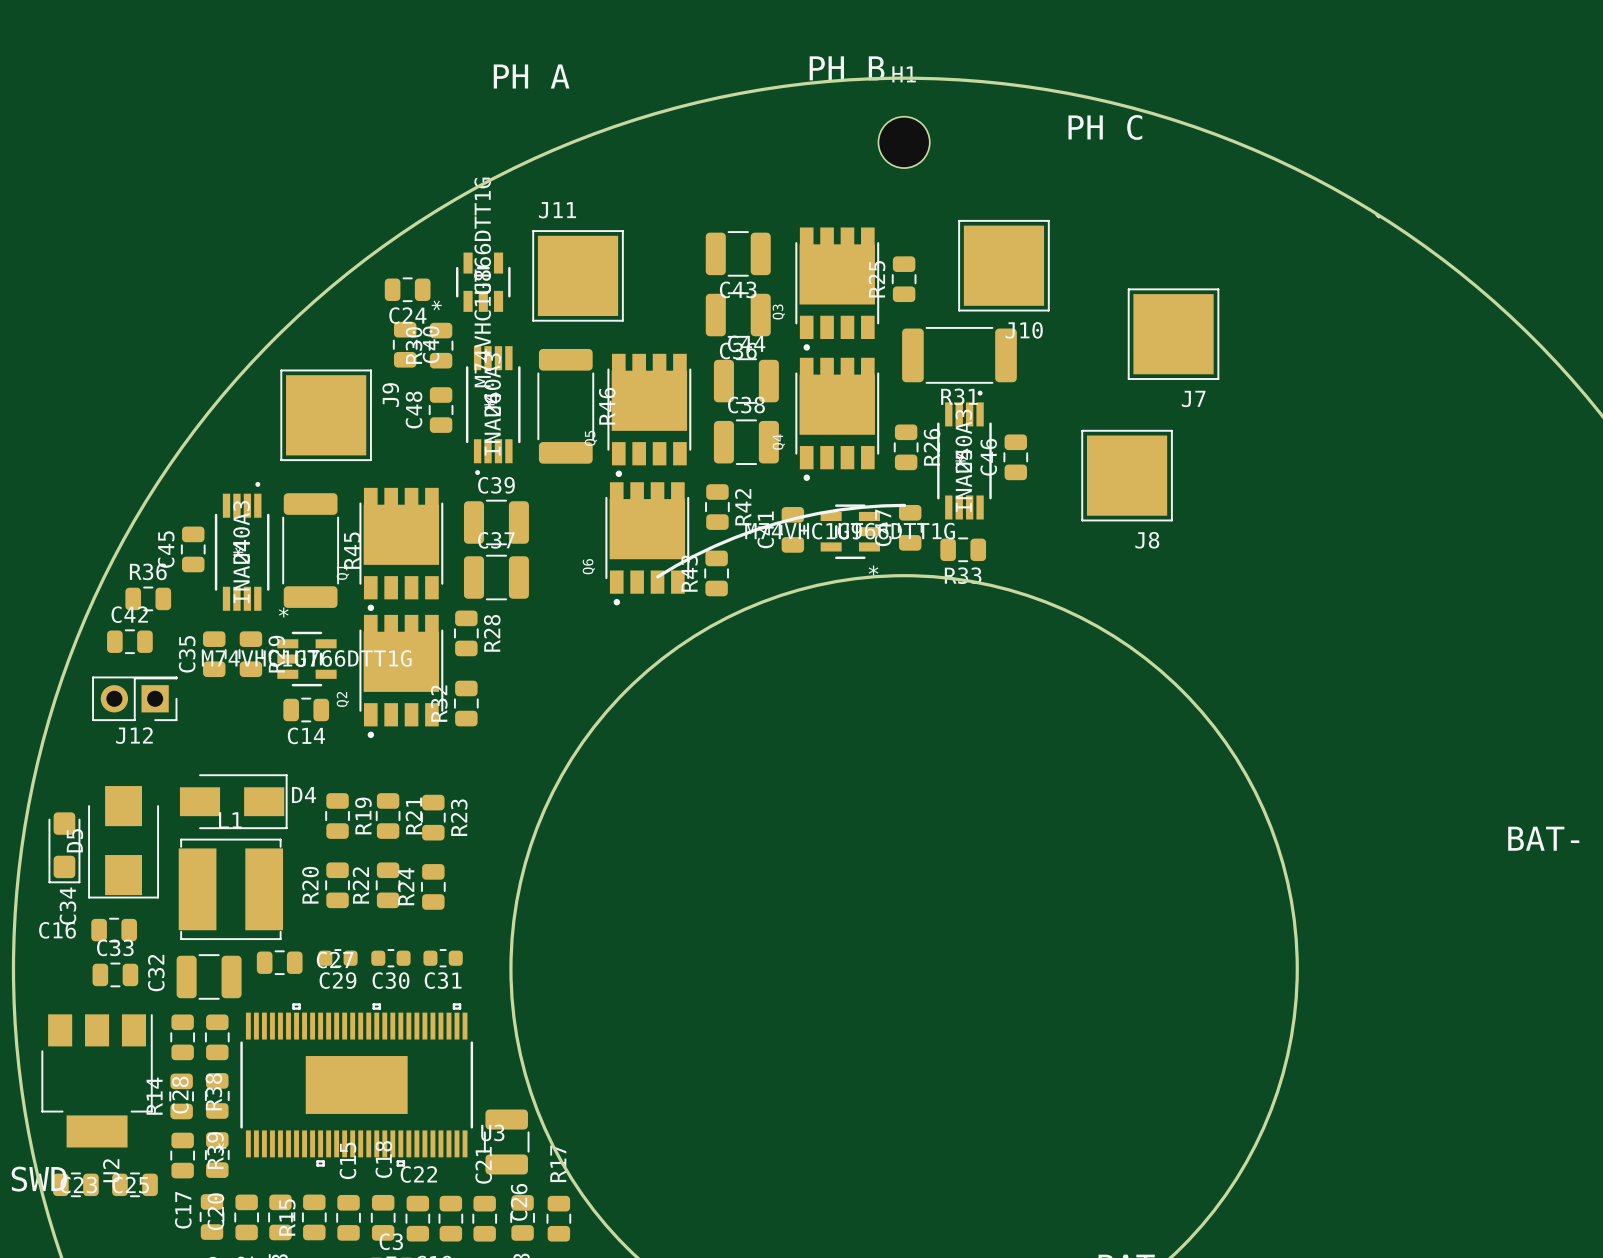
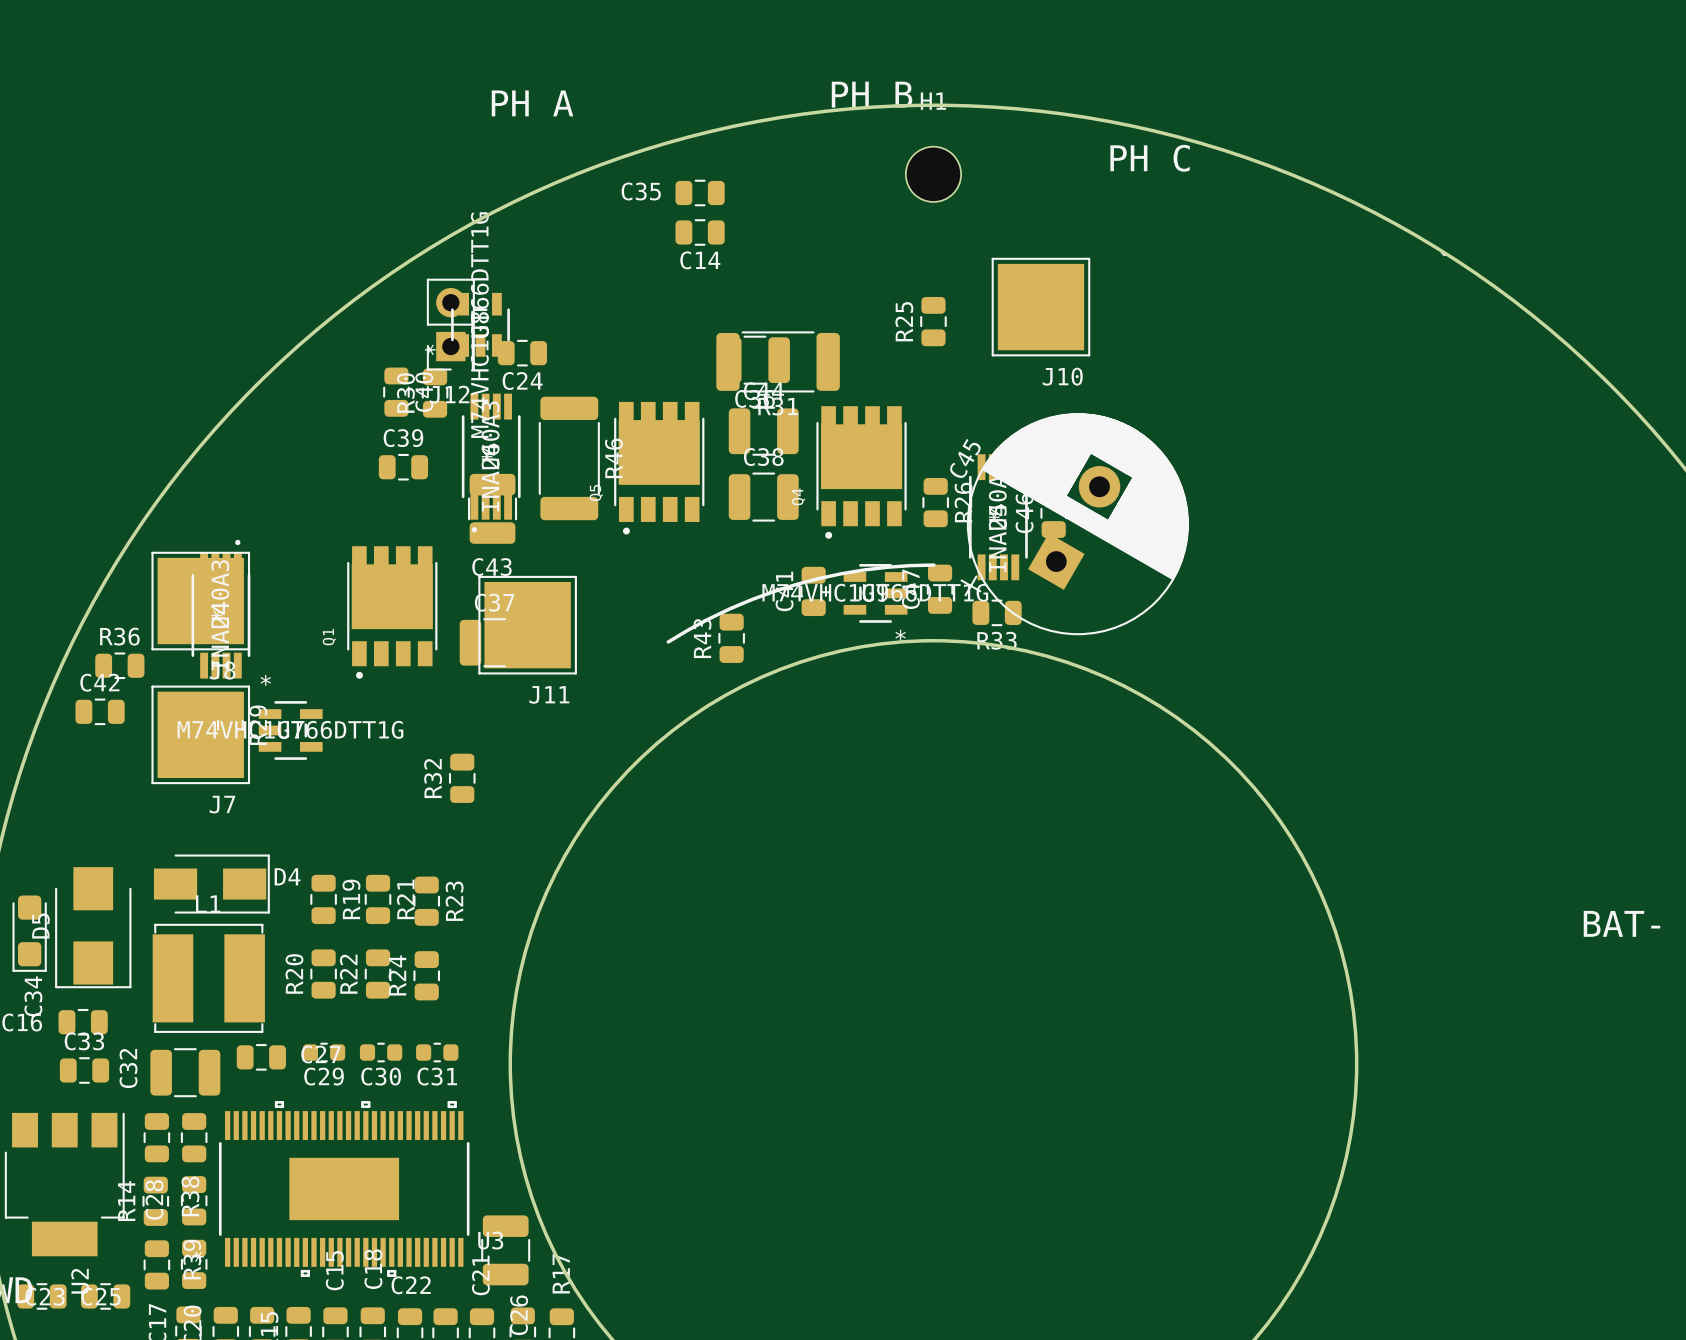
J11 name position: J11 (557, 210) -> J11 (549, 694)
C43 rotation: 0° (738, 253) -> 90° clockwise (492, 508)
C43 position: (738, 253) -> (492, 508)
J11 position: (578, 275) -> (527, 625)
C24 position: (407, 289) -> (522, 353)
Q3: (837, 289) -> none
J7 position: (1173, 334) -> (200, 734)
R31 position: (959, 355) -> (778, 361)
C48: (441, 410) -> none
J9: (326, 415) -> none
J8 position: (1127, 475) -> (200, 601)
C39 footprint: [463, 499, 529, 546] -> [378, 453, 429, 481]
R42: (717, 507) -> none
C45 footprint: [180, 526, 206, 573] -> [960, 413, 1189, 636]
Q6: (647, 543) -> none
C45 name position: C45 (166, 549) -> C45 (965, 458)
R45: (310, 550) -> none
R28: (466, 633) -> none
C35 rotation: 0° (214, 654) -> 90° clockwise (700, 193)
C35 position: (214, 654) -> (700, 193)
Q2: (401, 676) -> none
J12 rotation: 0° (134, 698) -> 90° clockwise (450, 324)
J12 position: (134, 698) -> (450, 324)
C14 position: (306, 709) -> (700, 232)

